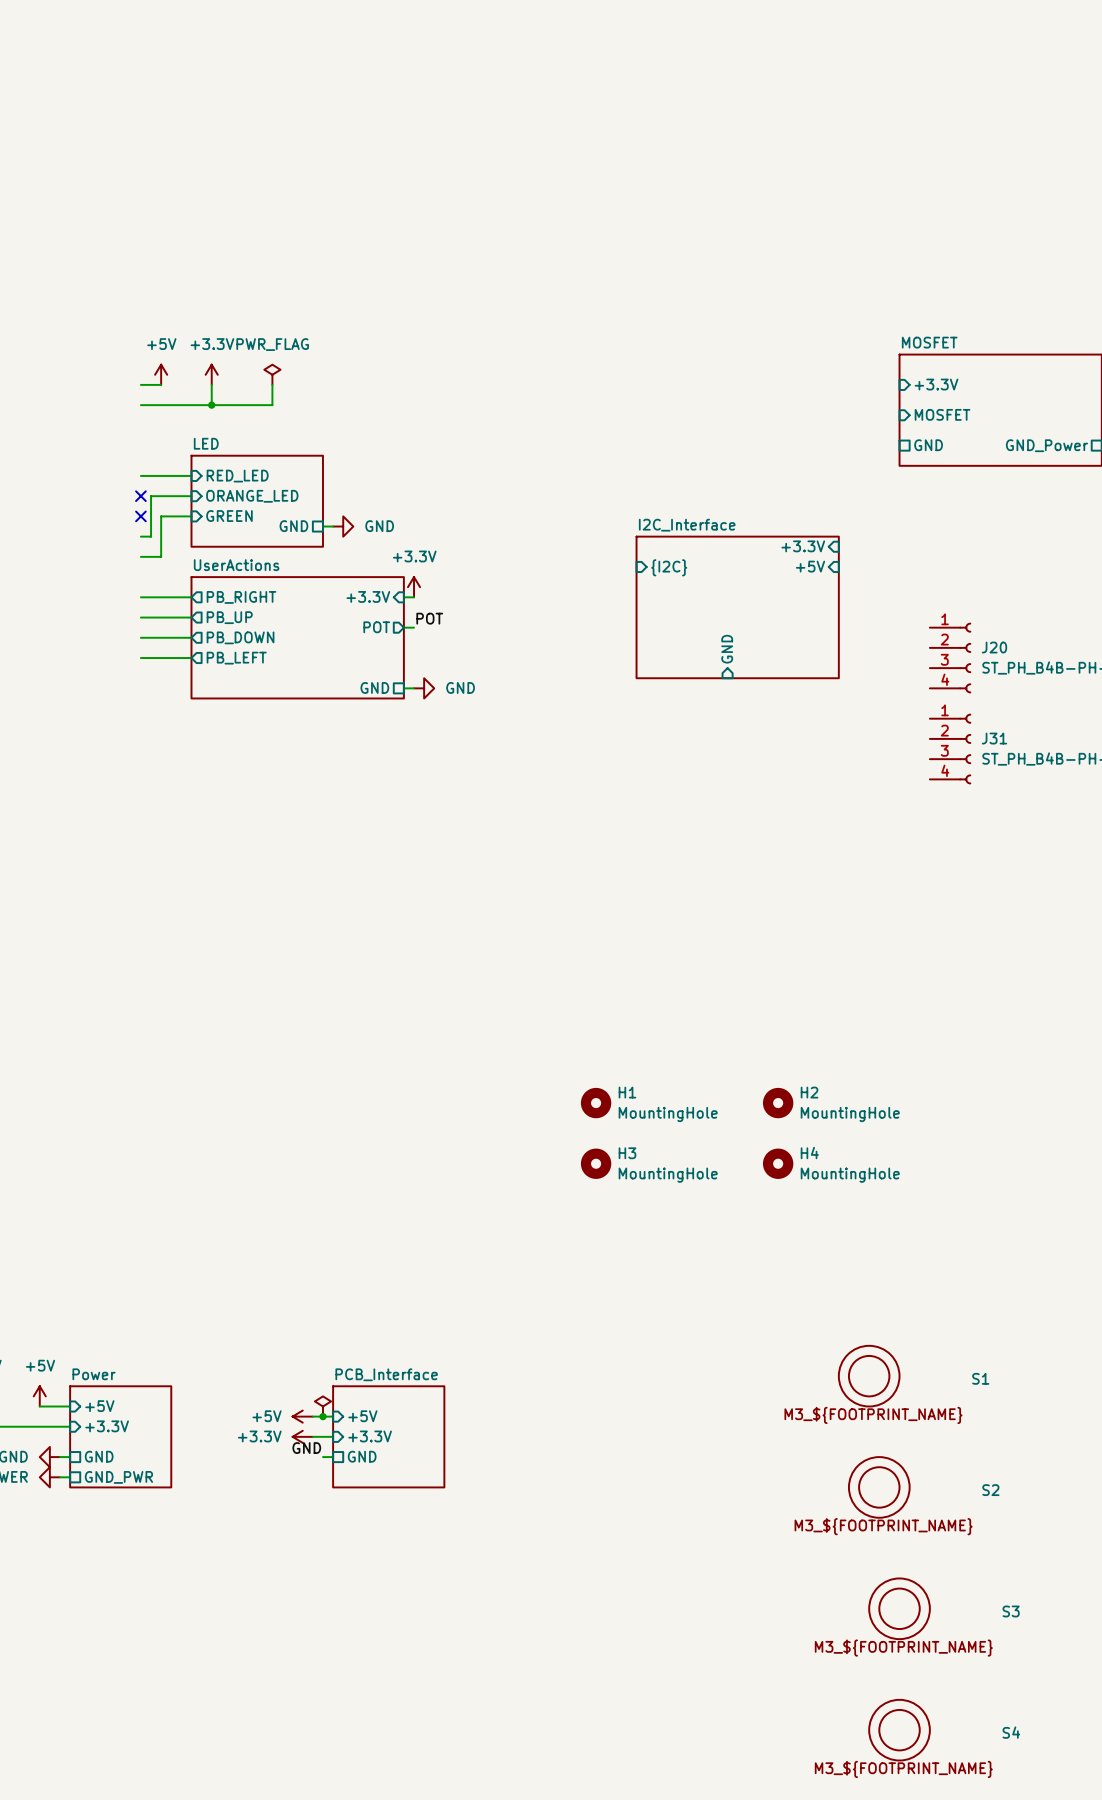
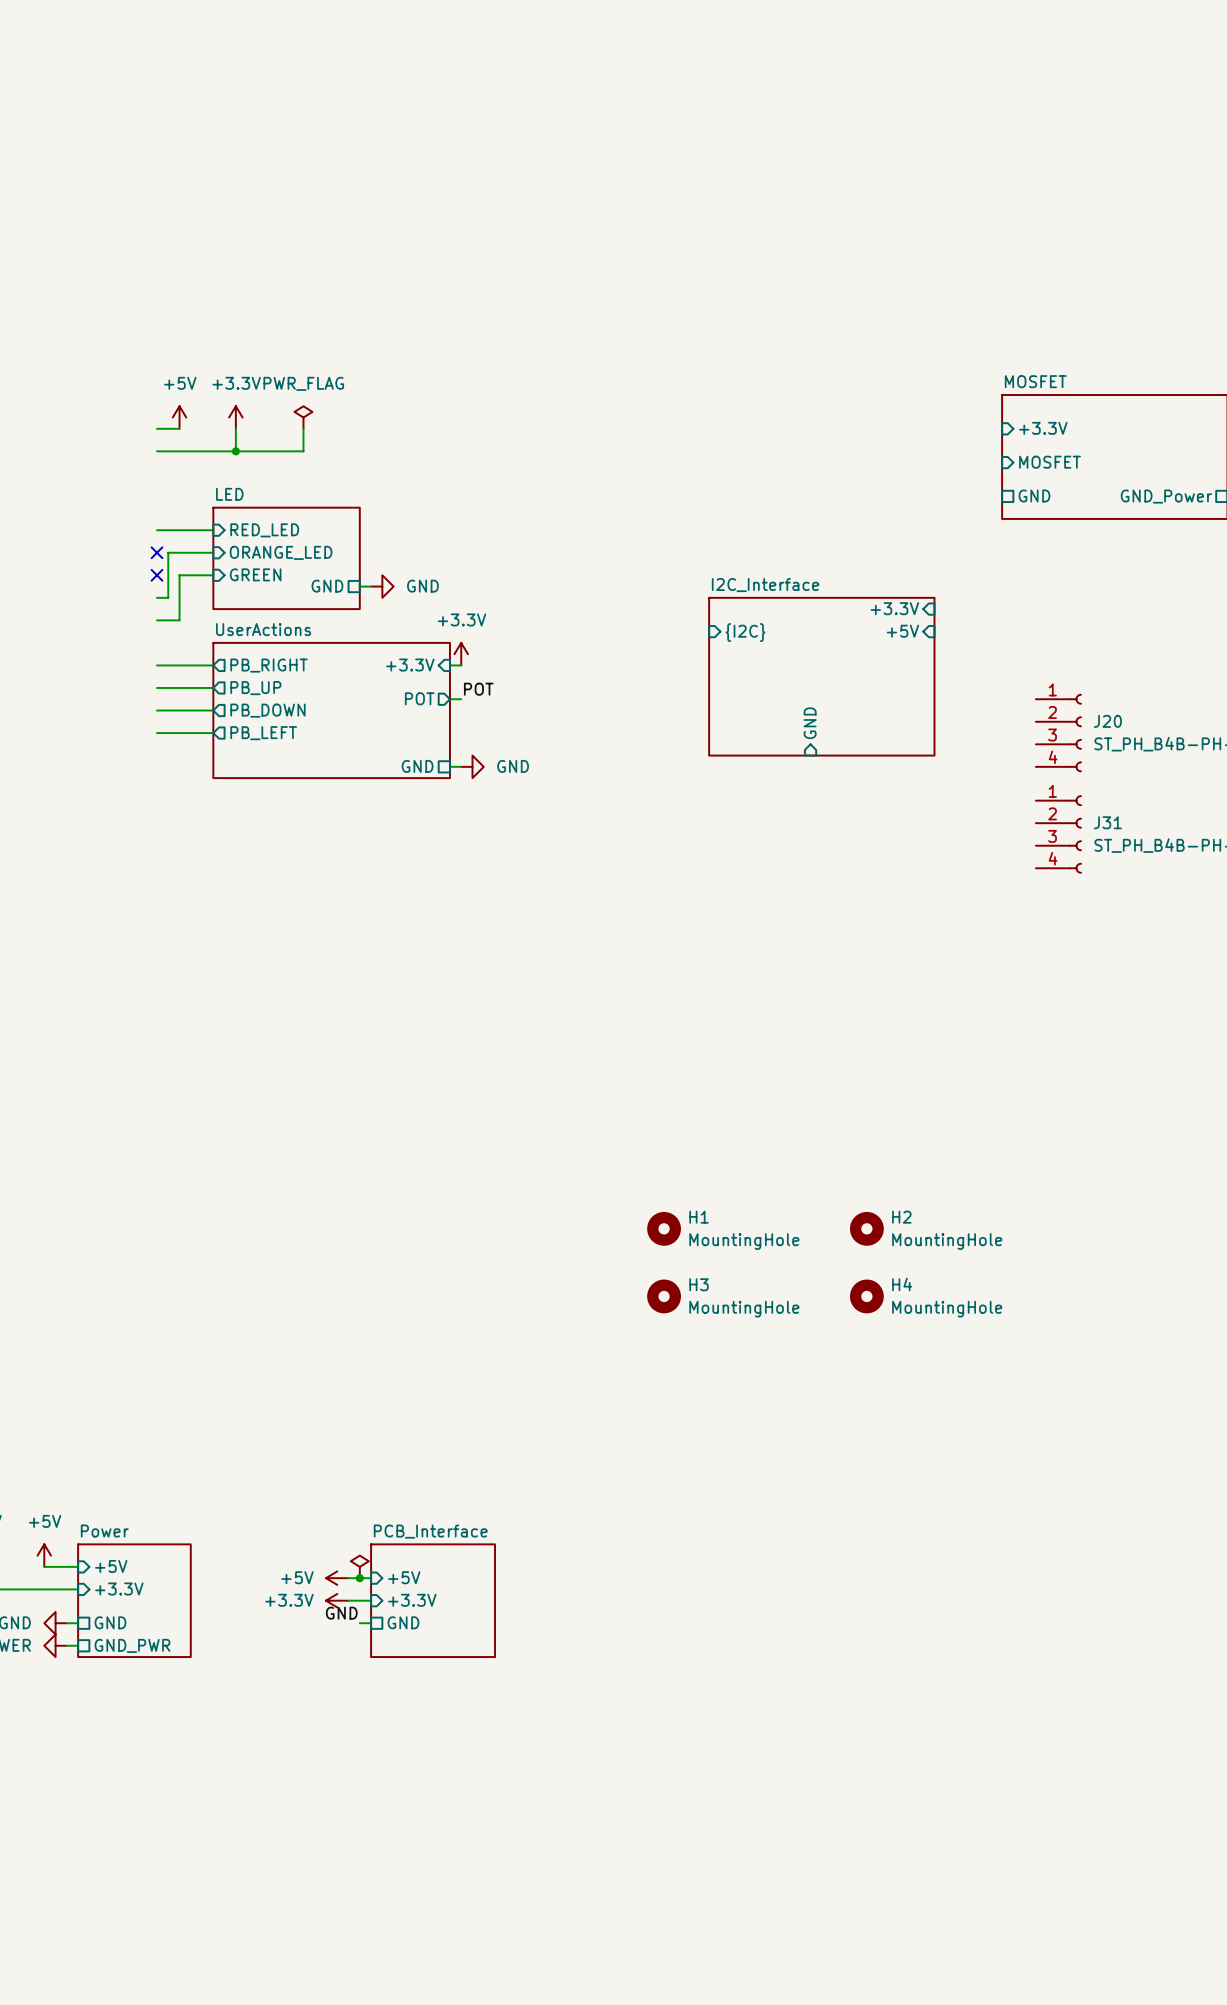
S1: (869, 1376) -> none
S2: (879, 1487) -> none
S3: (899, 1608) -> none
S4: (899, 1730) -> none

